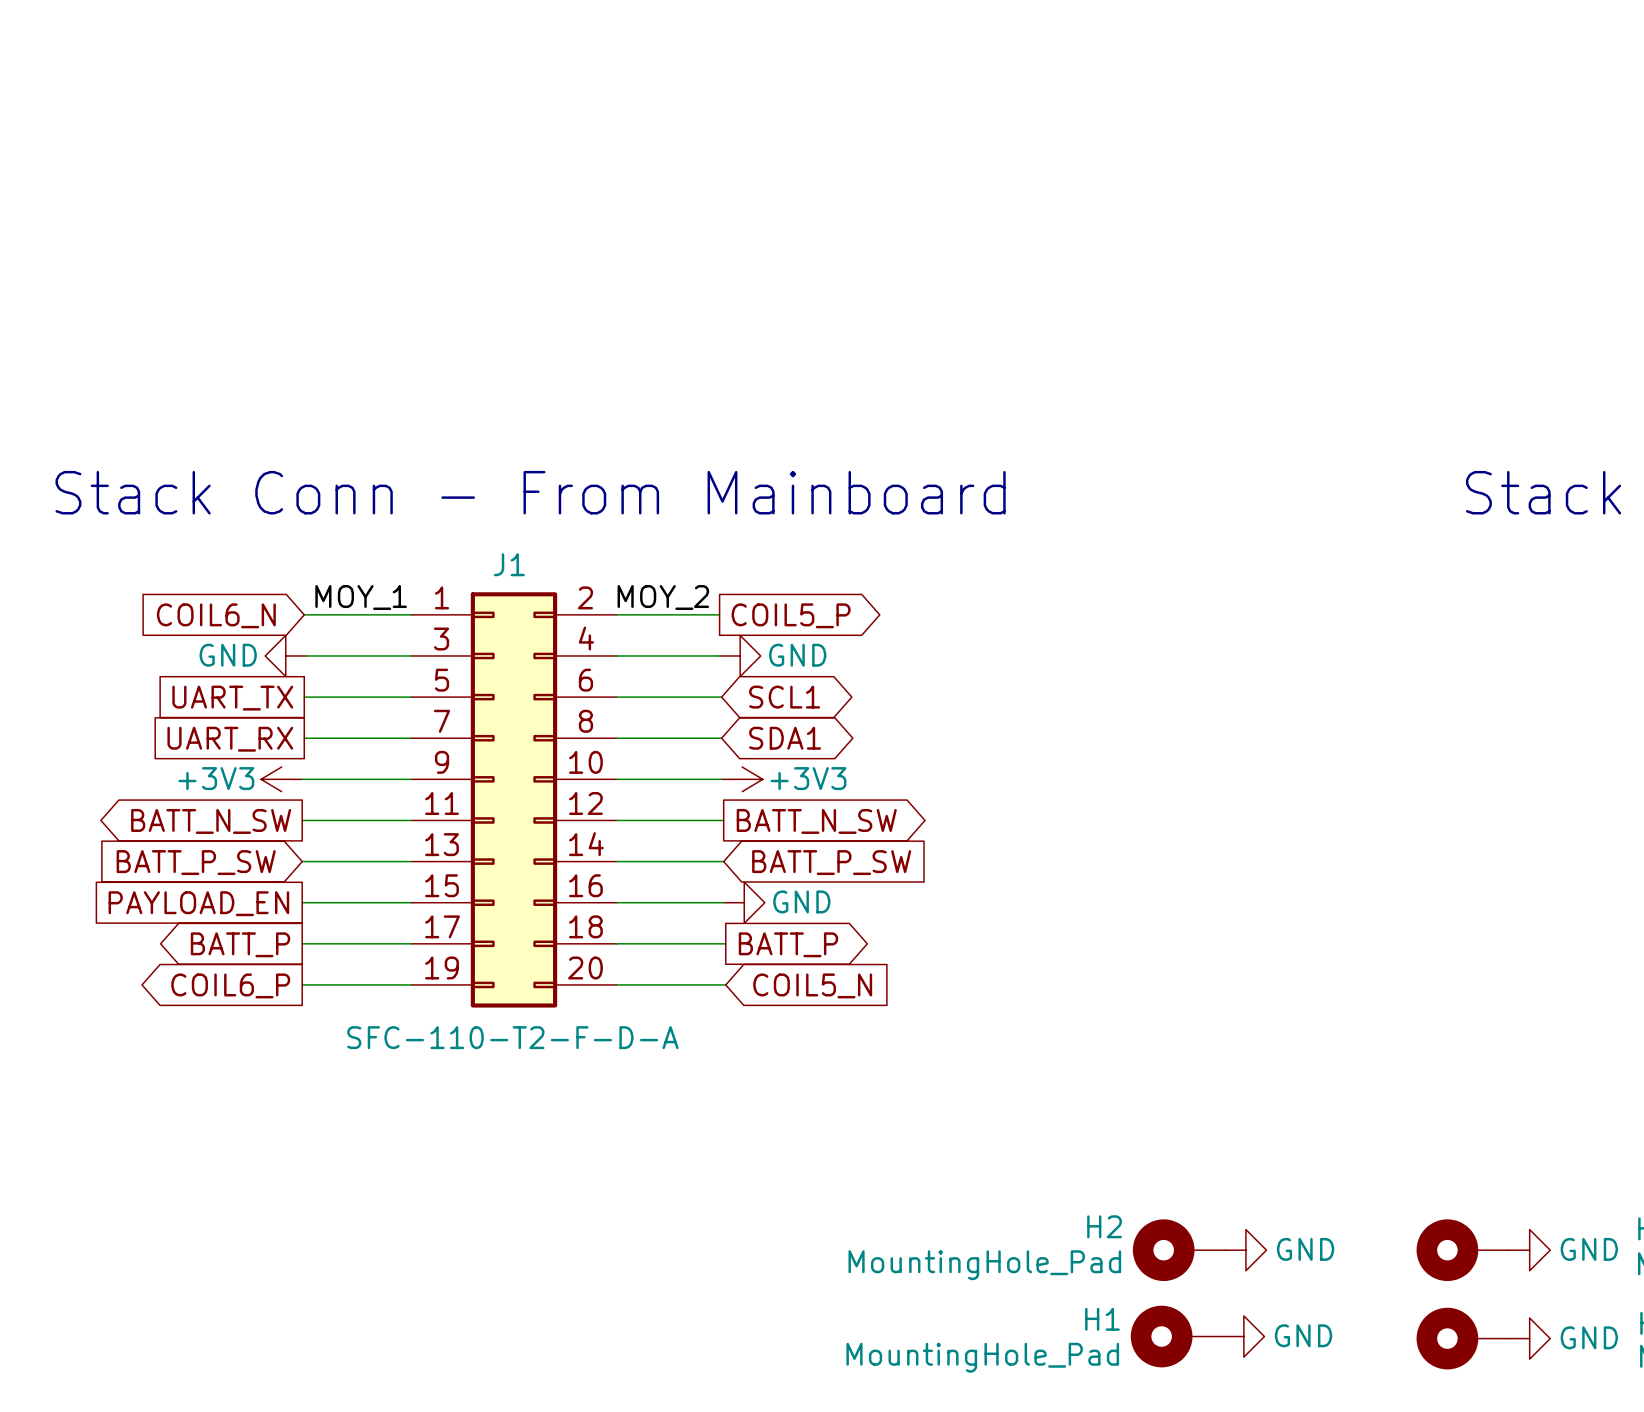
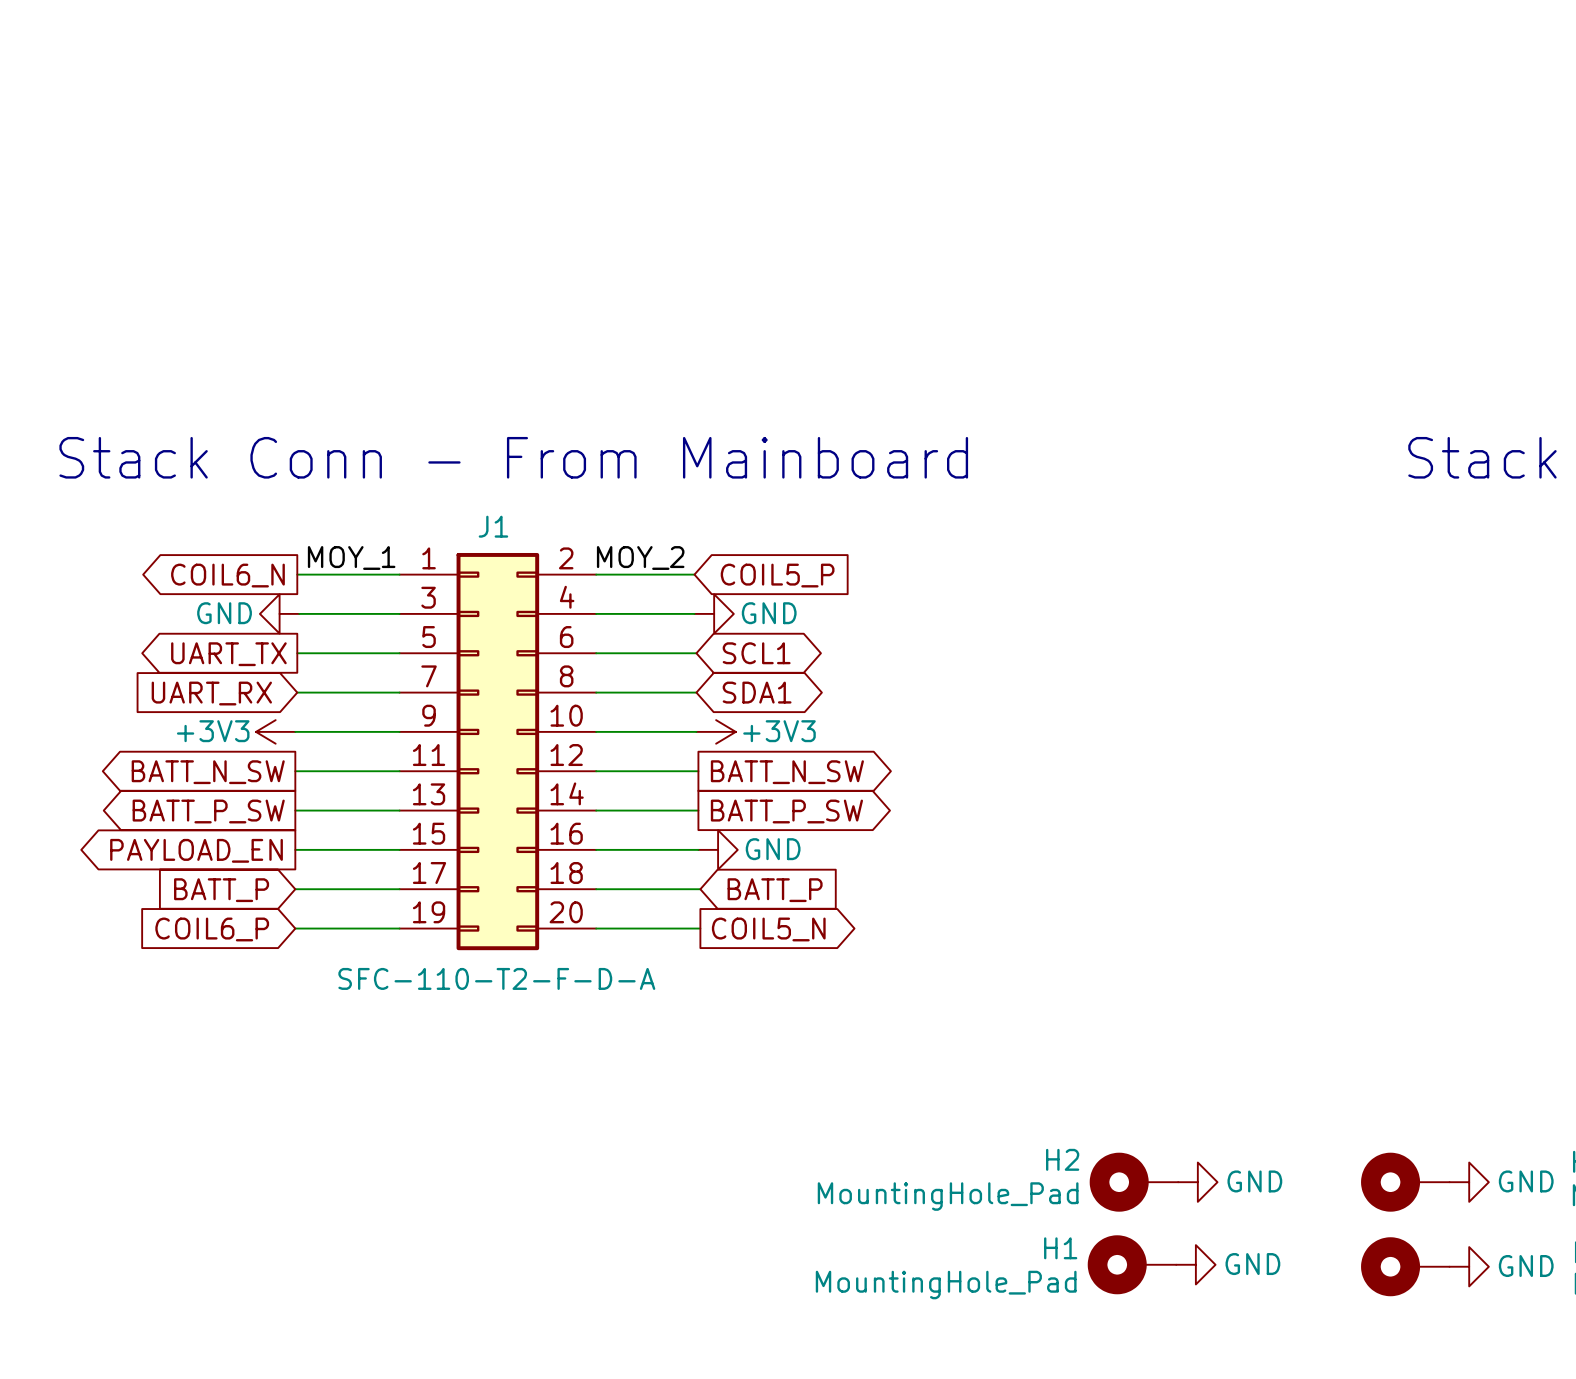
global label shape: input (216, 615) -> output (227, 575)
global label shape: output (791, 615) -> input (777, 575)
global label shape: passive (232, 698) -> output (228, 654)
global label shape: passive (230, 739) -> input (211, 693)
global label shape: input (196, 862) -> output (208, 811)
global label shape: input (831, 862) -> output (786, 811)
global label shape: passive (198, 903) -> output (196, 850)
global label shape: output (240, 944) -> input (221, 890)
global label shape: output (788, 944) -> input (775, 890)
global label shape: output (230, 985) -> input (212, 929)
global label shape: input (812, 985) -> output (768, 929)

